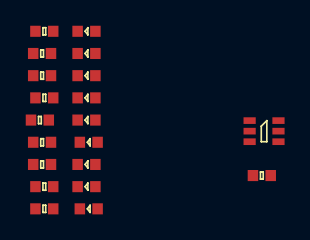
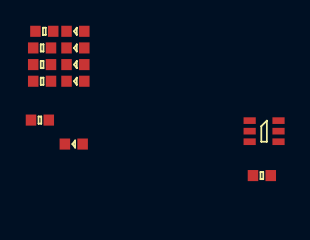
part: none -> (75, 31)
part: (86, 31) -> none
part: none -> (42, 47)
part: none -> (75, 47)
part: (42, 53) -> none
part: (86, 53) -> none
part: none -> (42, 64)
part: none -> (75, 64)
part: (42, 75) -> none
part: (86, 75) -> none
part: none -> (42, 81)
part: none -> (75, 81)
part: (44, 97) -> none
part: (86, 97) -> none
part: (86, 120) -> none
part: (42, 142) -> none
part: (88, 142) -> none
part: none -> (73, 144)
part: (42, 164) -> none
part: (86, 164) -> none
part: (44, 186) -> none
part: (86, 186) -> none
part: (44, 208) -> none
part: (88, 208) -> none

